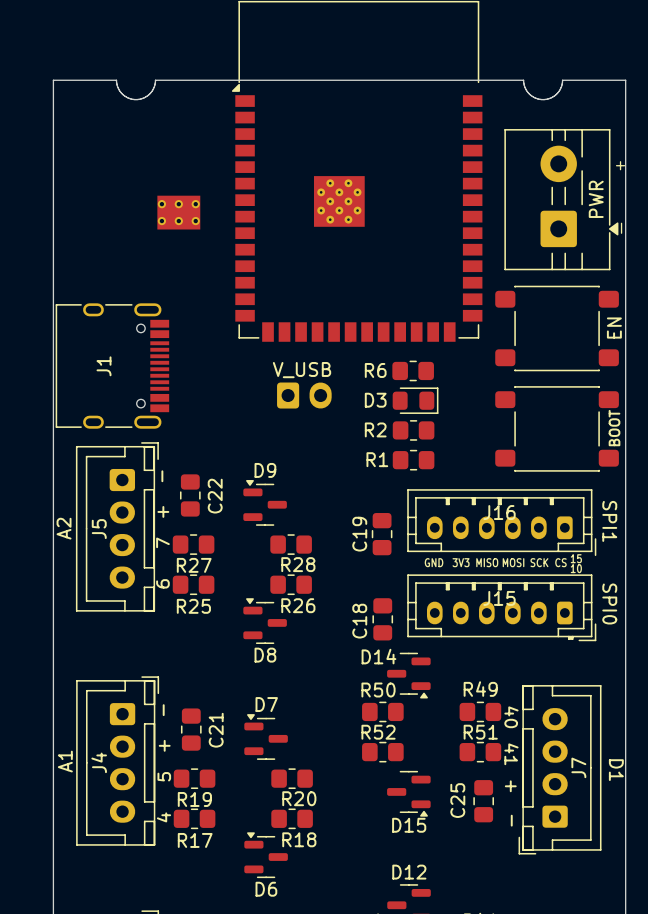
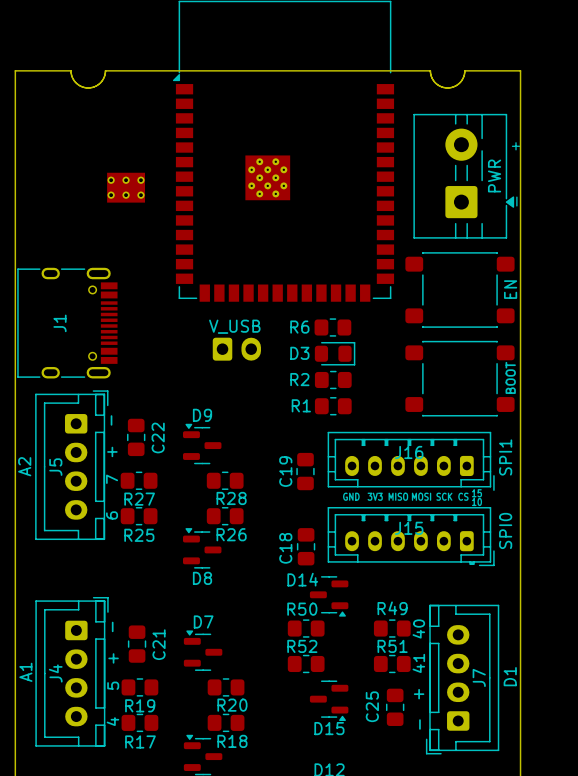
text rotation: 0° (609, 521) -> 180° (505, 457)
text rotation: 0° (609, 604) -> 180° (505, 530)
text rotation: 0° (511, 717) -> 180° (418, 628)
text rotation: 0° (511, 754) -> 180° (418, 663)
text rotation: 0° (616, 770) -> 180° (510, 676)

